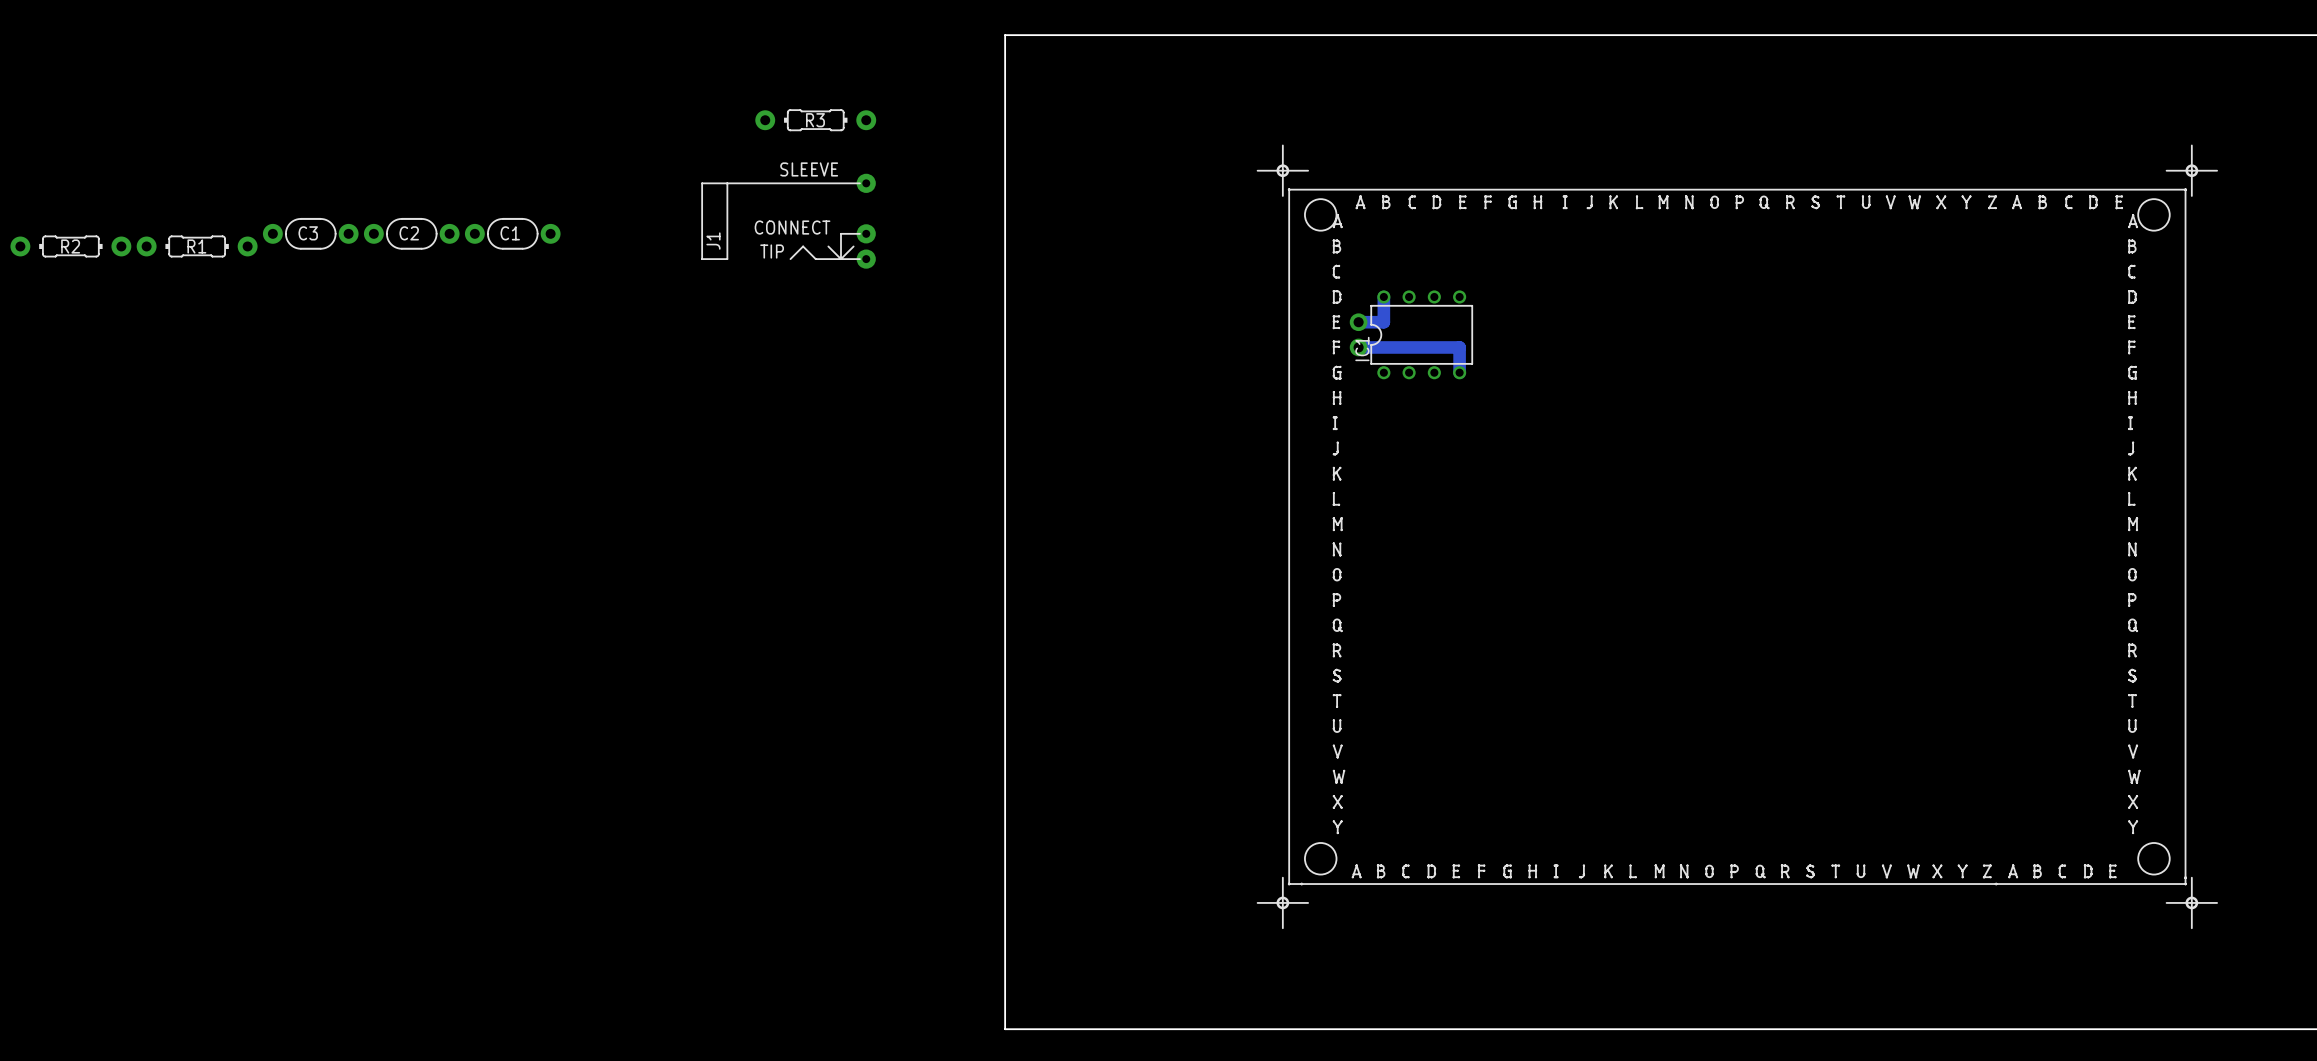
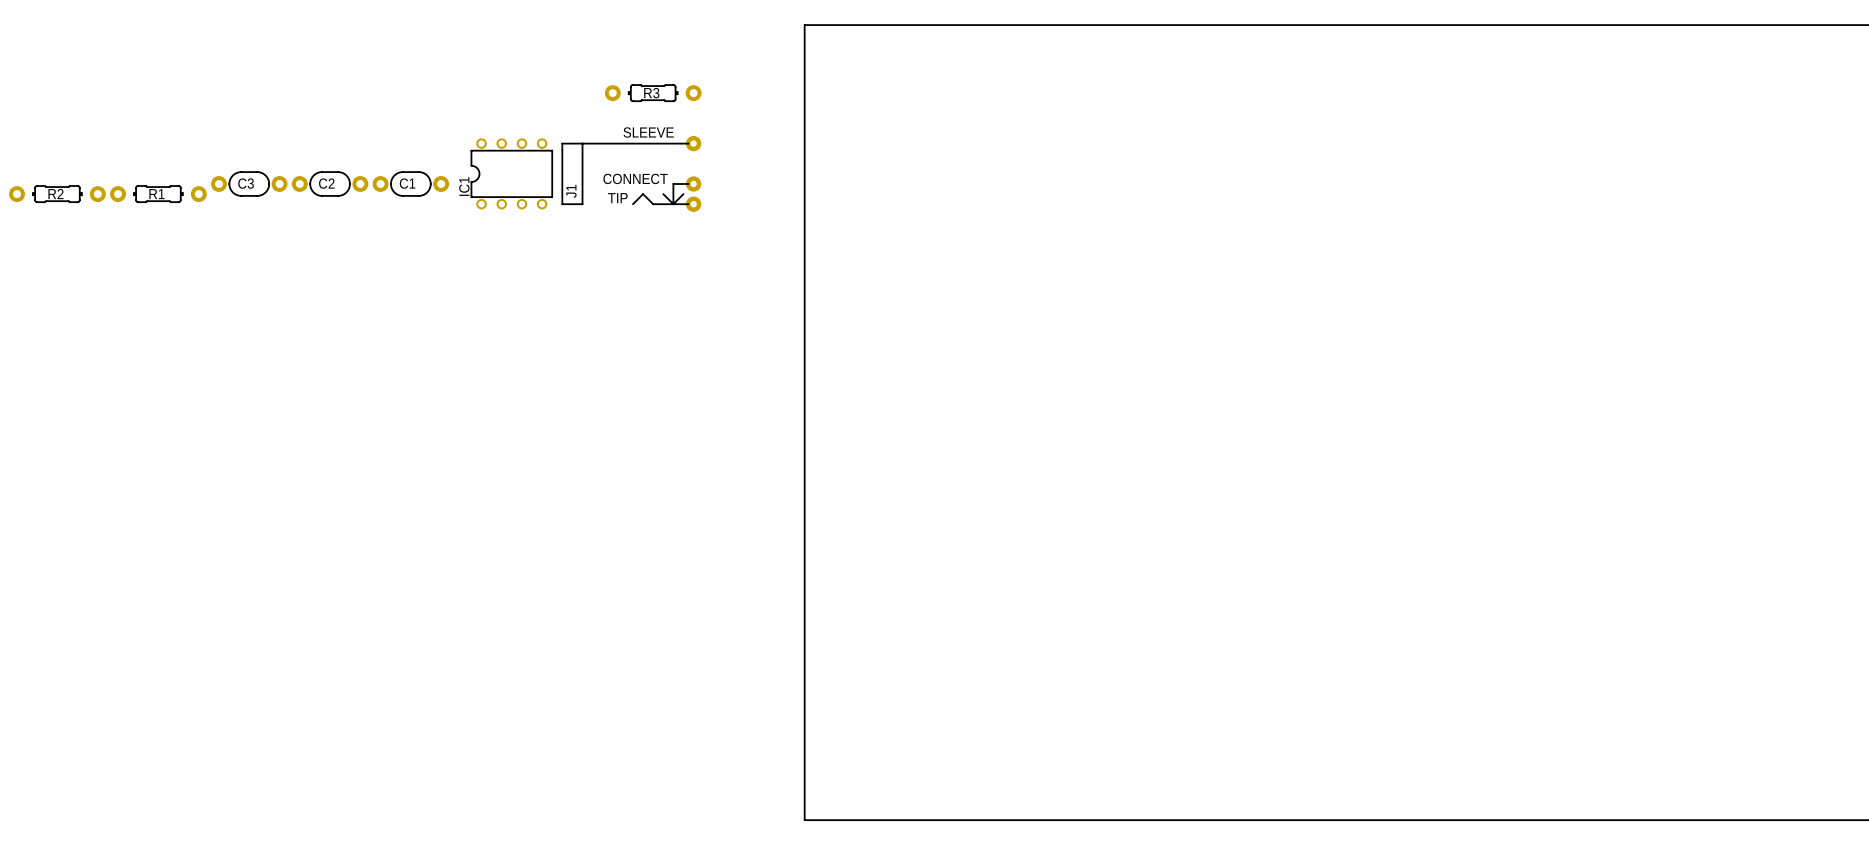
drawing: [1256, 144, 2218, 929] -> none
bottom track: (1383, 296) (1383, 322) (1358, 322) -> none
part: (1358, 334) -> none
IC1 position: (1421, 334) -> (511, 173)
bottom track: (1358, 347) (1459, 347) (1459, 372) -> none

